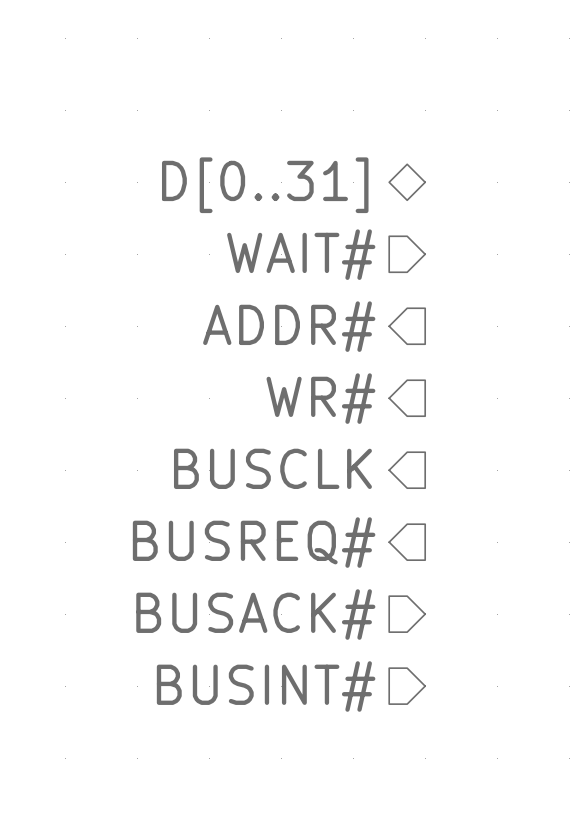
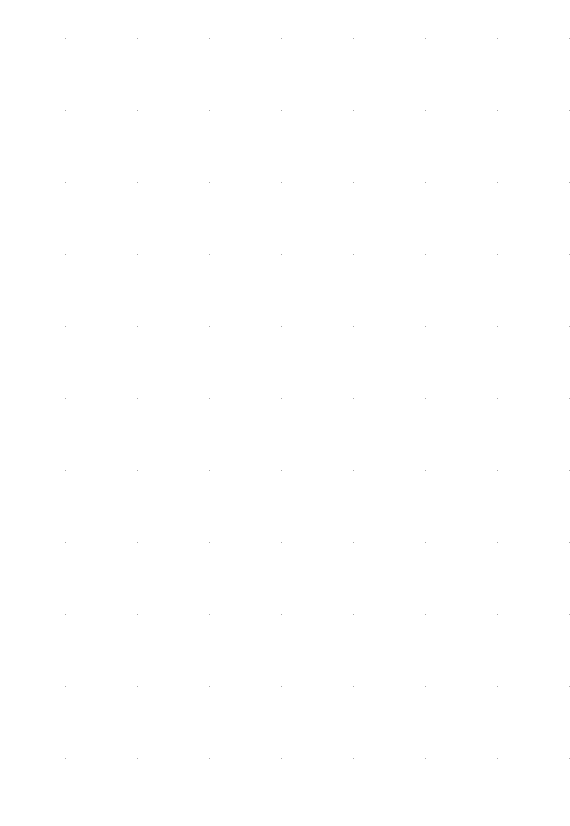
hierarchical label: D[0..31] (265, 185) -> none
hierarchical label: WAIT# (301, 254) -> none
hierarchical label: ADDR# (289, 326) -> none
hierarchical label: WR# (320, 398) -> none
hierarchical label: BUSCLK (272, 468) -> none
hierarchical label: BUSREQ# (254, 542) -> none
hierarchical label: BUSACK# (255, 614) -> none
hierarchical label: BUSINT# (266, 686) -> none

